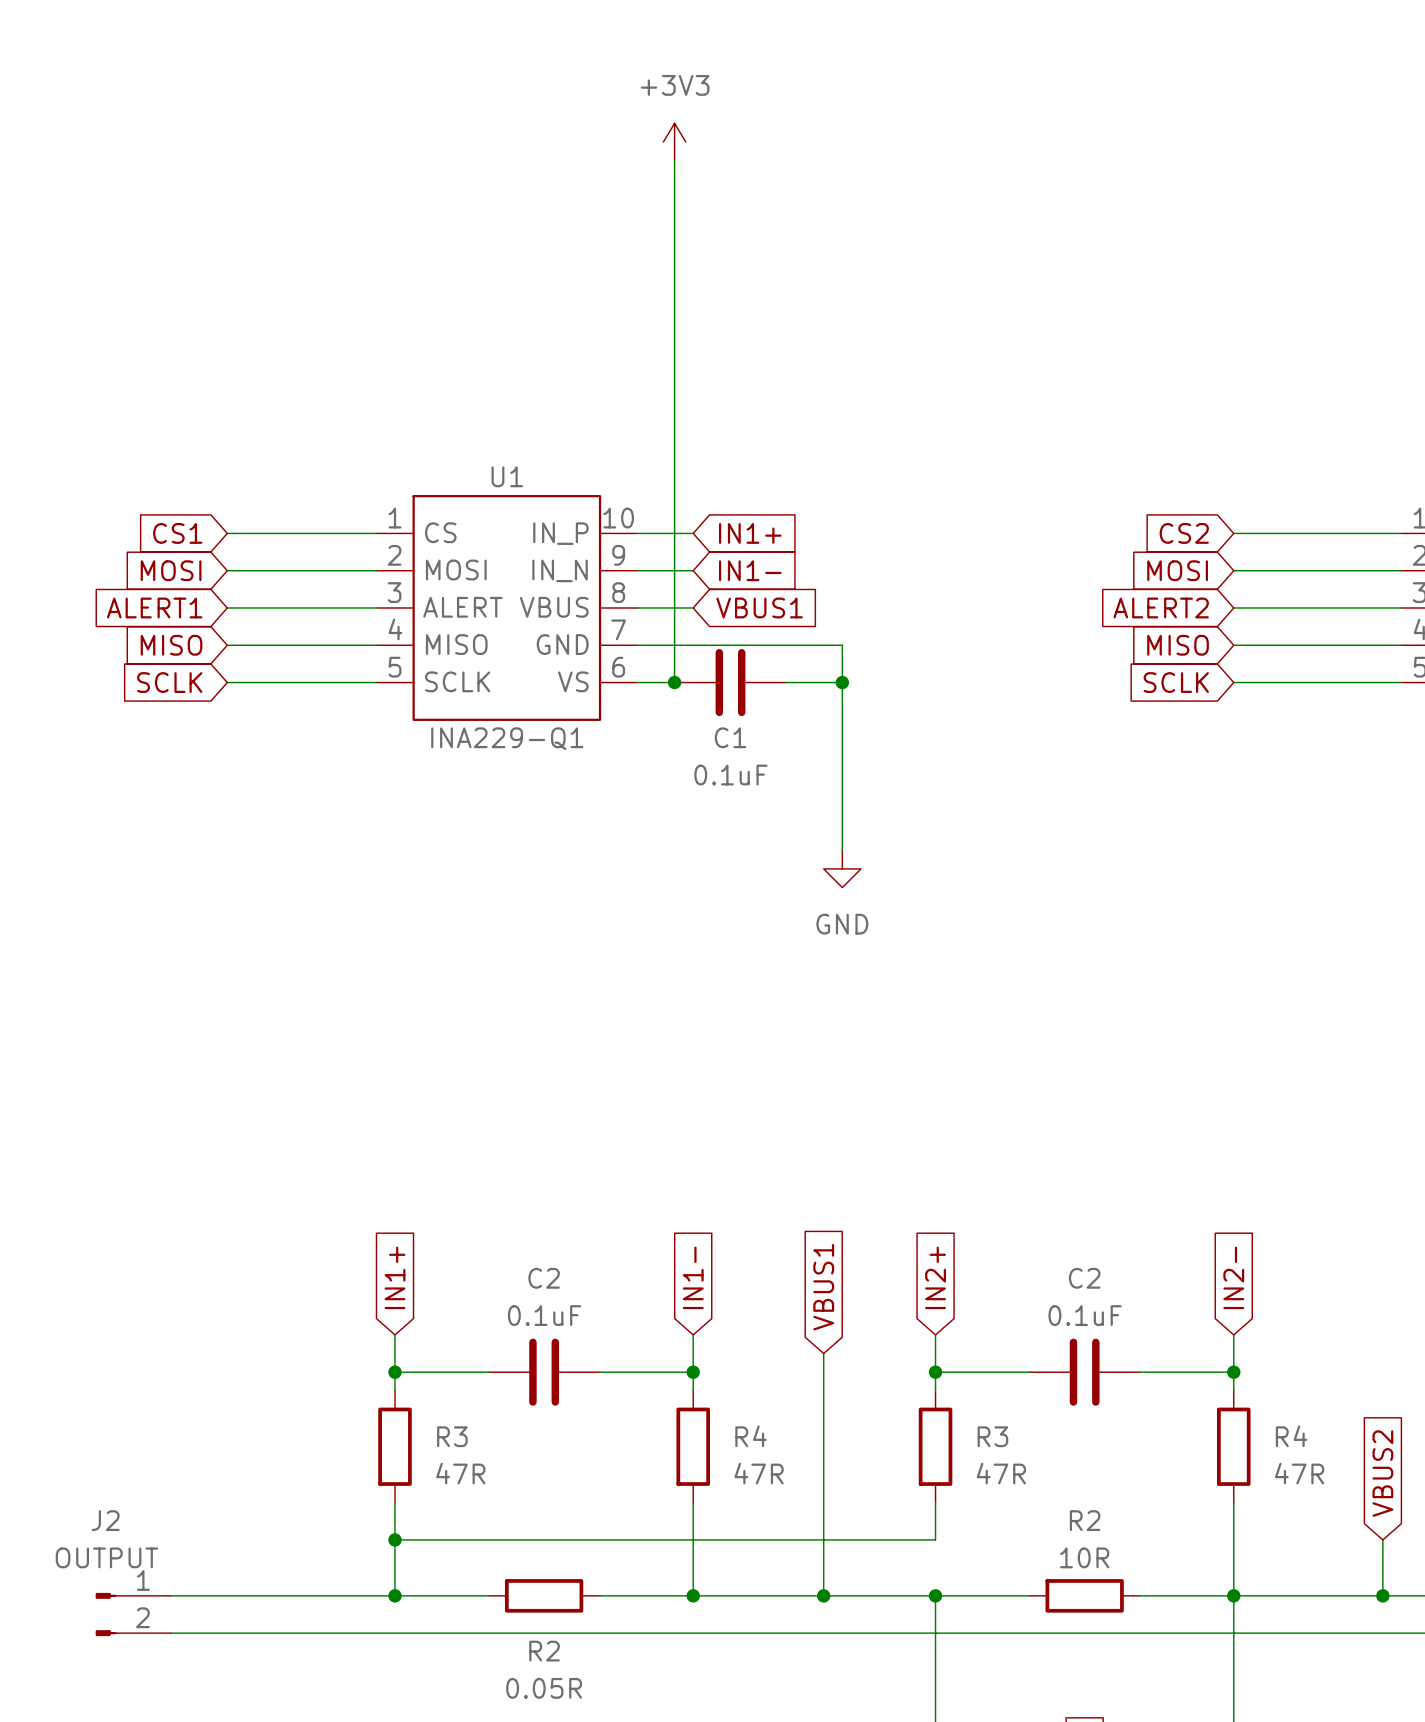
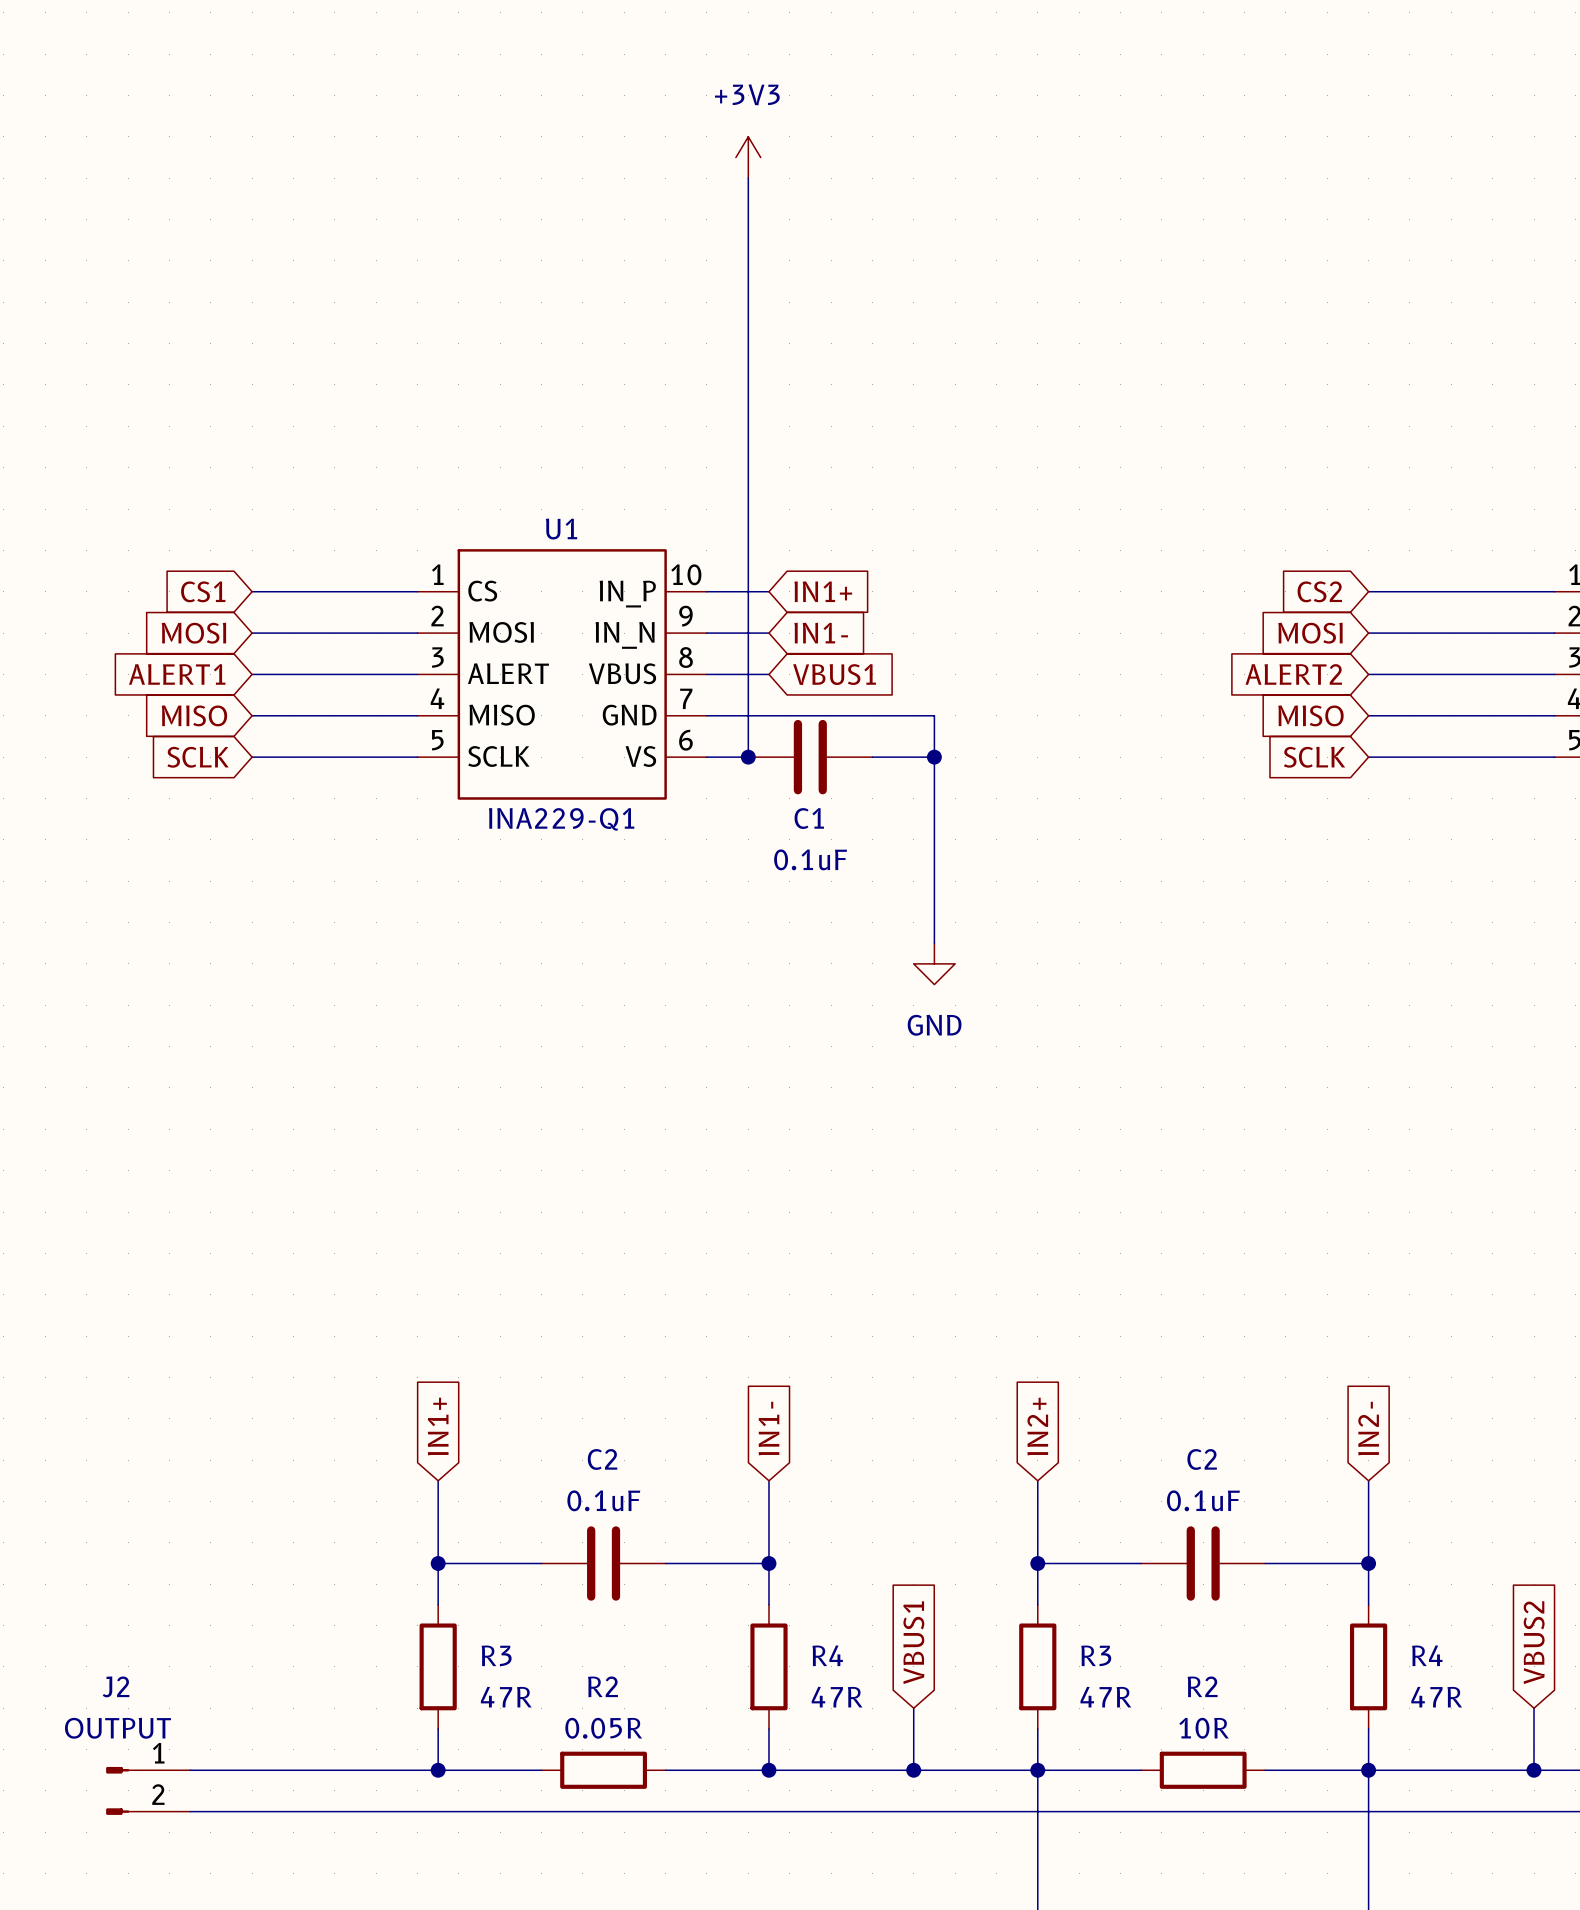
global label position: VBUS1 (823, 1287) -> VBUS1 (913, 1642)
wire: (823, 1353) (823, 1539) -> none
wire: (395, 1372) (488, 1372) -> (438, 1563) (541, 1563)
junction position: (395, 1372) -> (438, 1563)
C2 position: (544, 1372) -> (603, 1563)
wire: (600, 1372) (693, 1372) -> (665, 1563) (768, 1563)
junction position: (693, 1372) -> (768, 1563)
wire: (935, 1372) (1028, 1372) -> (1037, 1563) (1141, 1563)
junction position: (935, 1372) -> (1037, 1563)
C2 position: (1084, 1372) -> (1203, 1563)
wire: (1140, 1372) (1233, 1372) -> (1265, 1563) (1368, 1563)
junction position: (1233, 1372) -> (1368, 1563)
wire: none -> (1037, 1542) (1037, 1604)
R3 position: (395, 1446) -> (438, 1666)
R4 position: (693, 1446) -> (768, 1666)
R3 position: (935, 1446) -> (1037, 1666)
R4 position: (1233, 1446) -> (1368, 1666)
wire: (395, 1502) (395, 1558) -> (438, 1542) (438, 1604)
wire: (693, 1502) (693, 1558) -> (768, 1542) (768, 1604)
wire: (935, 1502) (935, 1539) (395, 1539) -> none
wire: (1233, 1502) (1233, 1558) -> (1368, 1542) (1368, 1604)
junction: (395, 1539) -> none
wire: none -> (1037, 1728) (1037, 1770)
R2 name position: R2 (544, 1651) -> R2 (602, 1686)
R2 value position: 0.05R (544, 1688) -> 0.05R (603, 1728)

